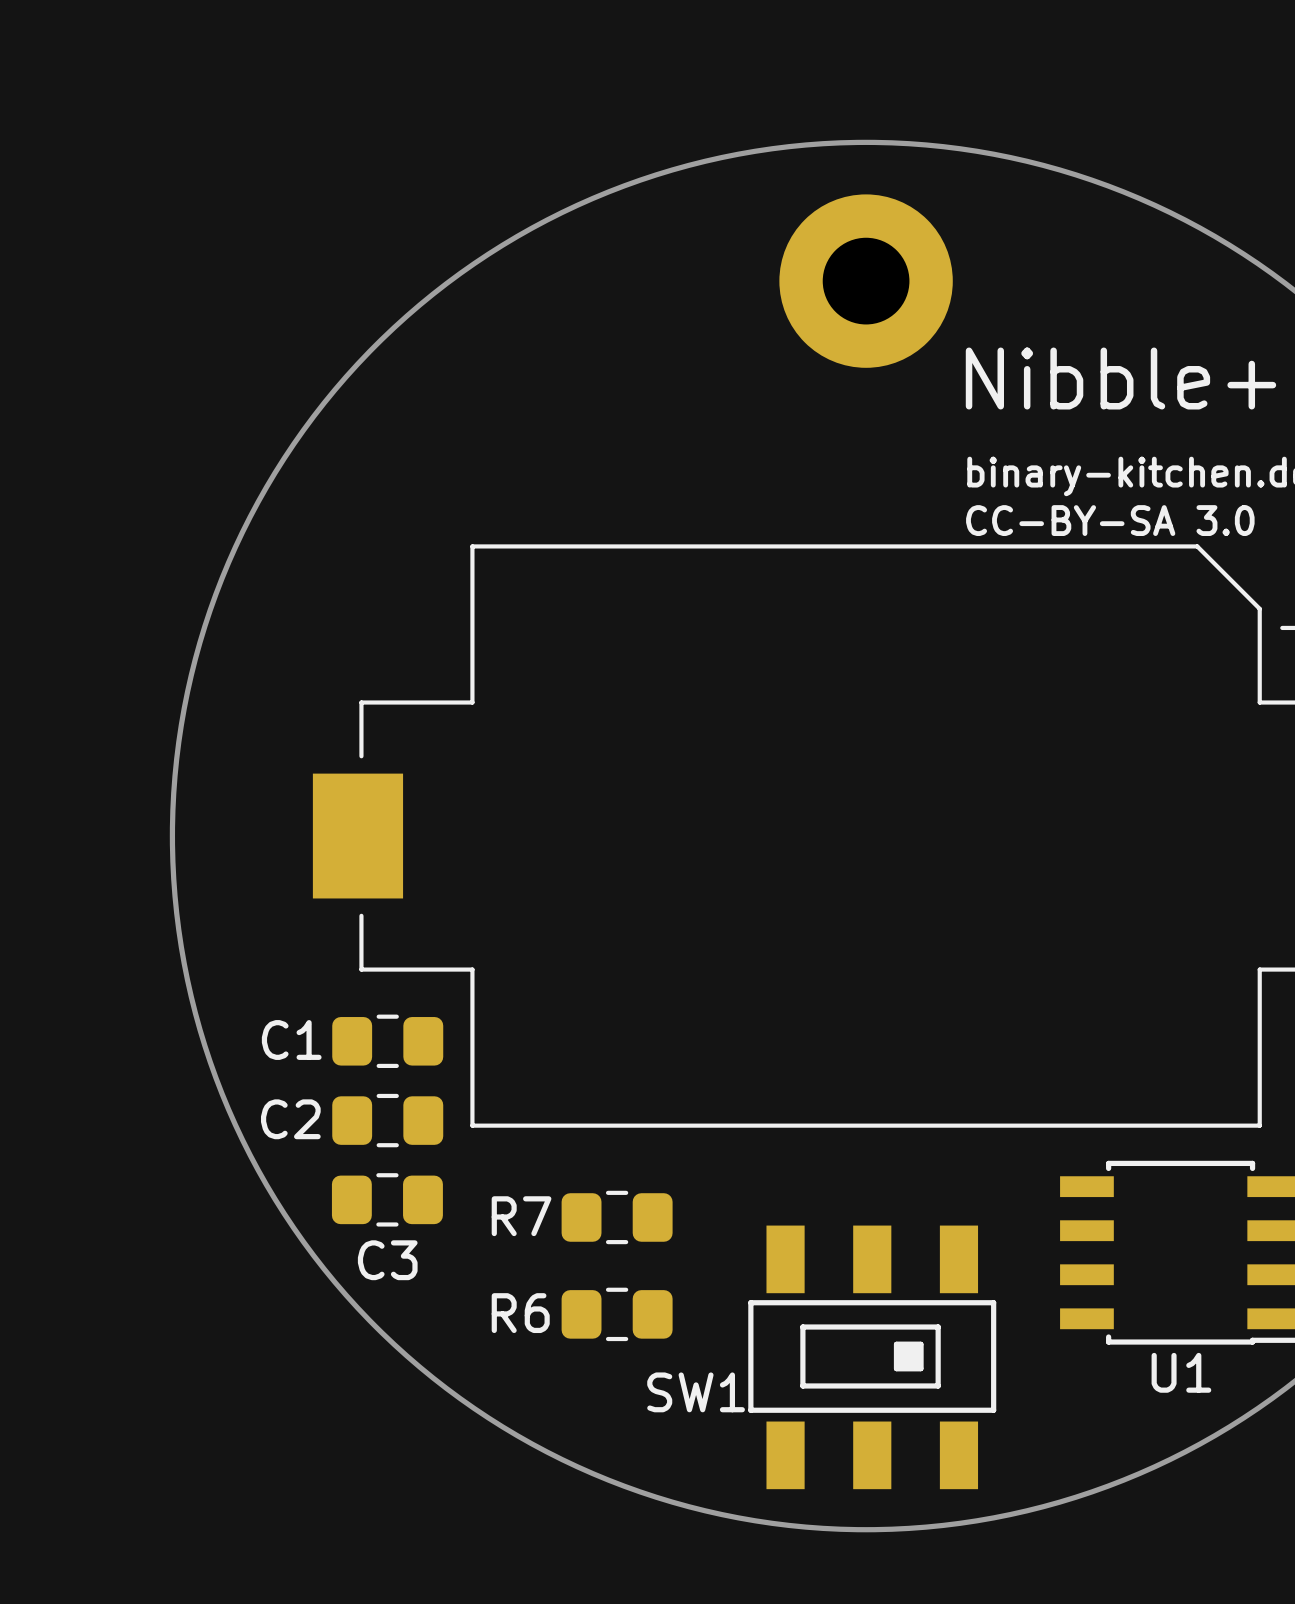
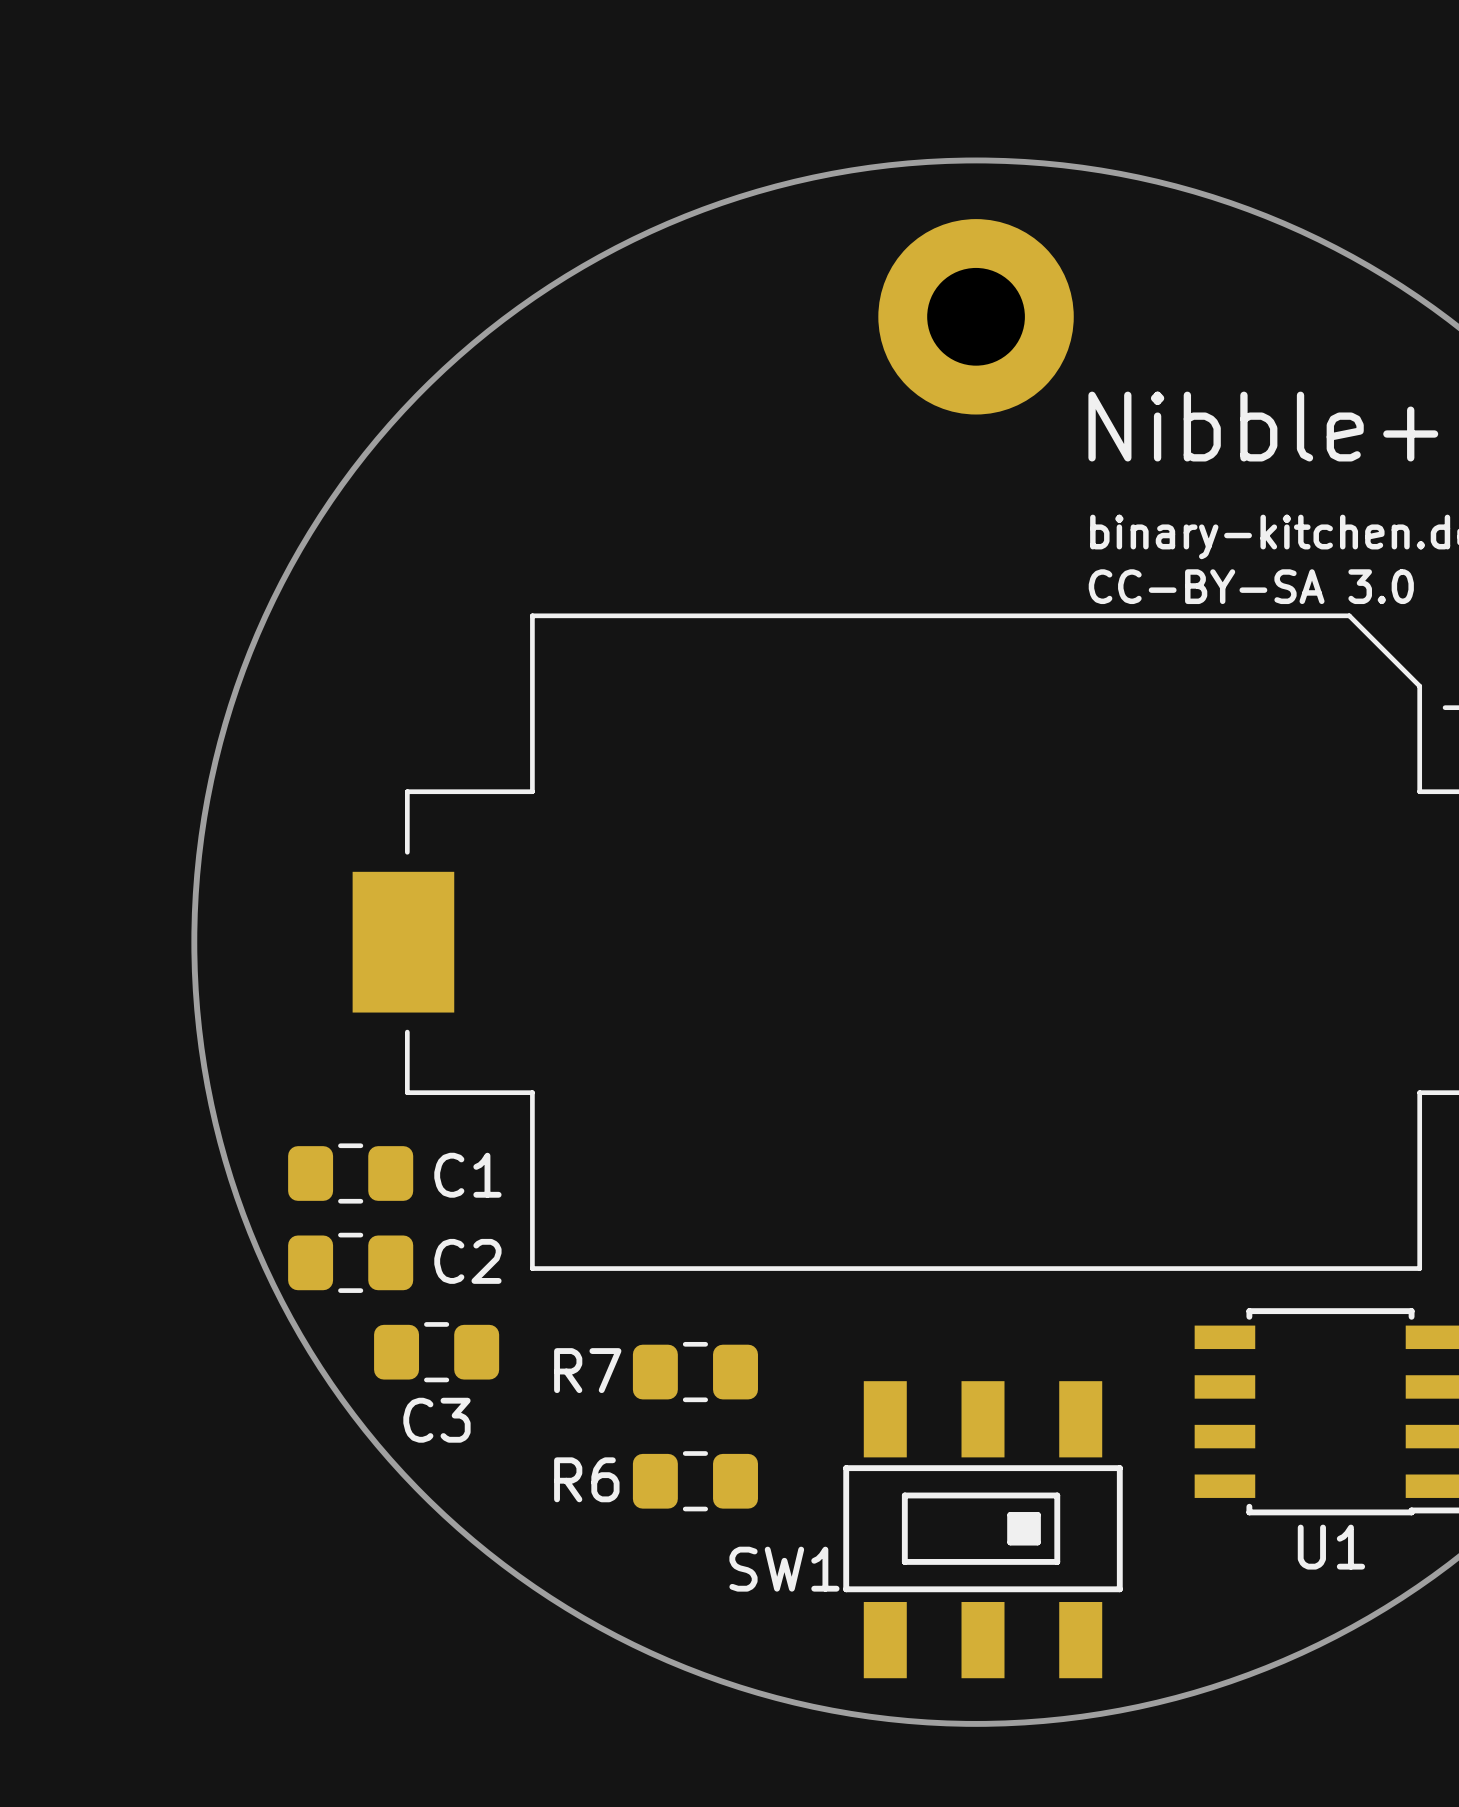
C1 name position: C1 (291, 1039) -> C1 (467, 1175)
C1 position: (387, 1041) -> (350, 1173)
C2 name position: C2 (290, 1119) -> C2 (467, 1261)
C2 position: (387, 1120) -> (350, 1262)

